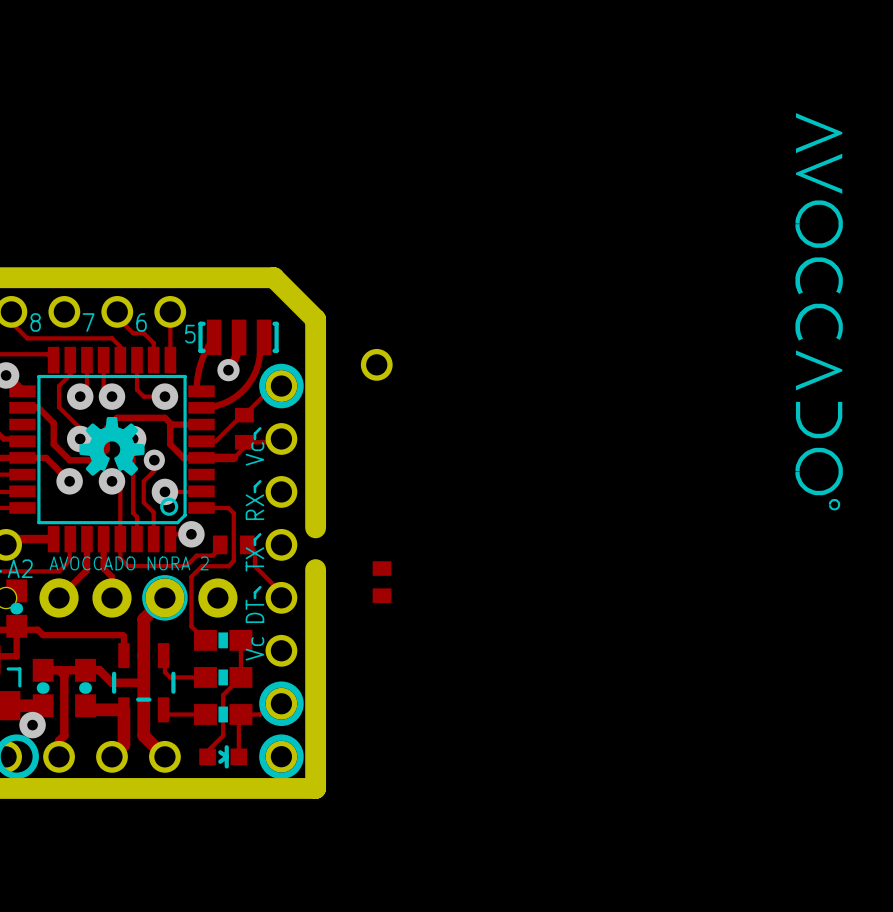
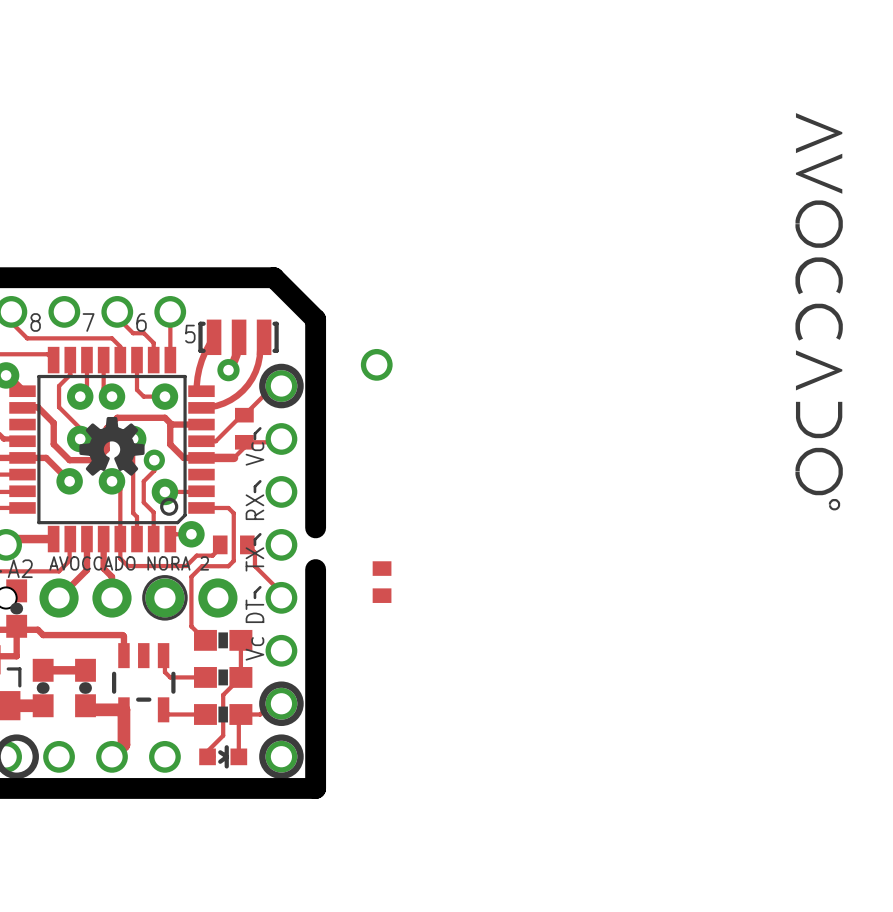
track: (164, 598) (143, 619) (143, 735) (164, 756) -> none
track: (59, 670) (64, 675) (64, 735) (59, 740) (59, 756) -> none
track: (85, 670) (99, 670) (111, 682) (143, 682) -> none
via: (32, 725) -> none

